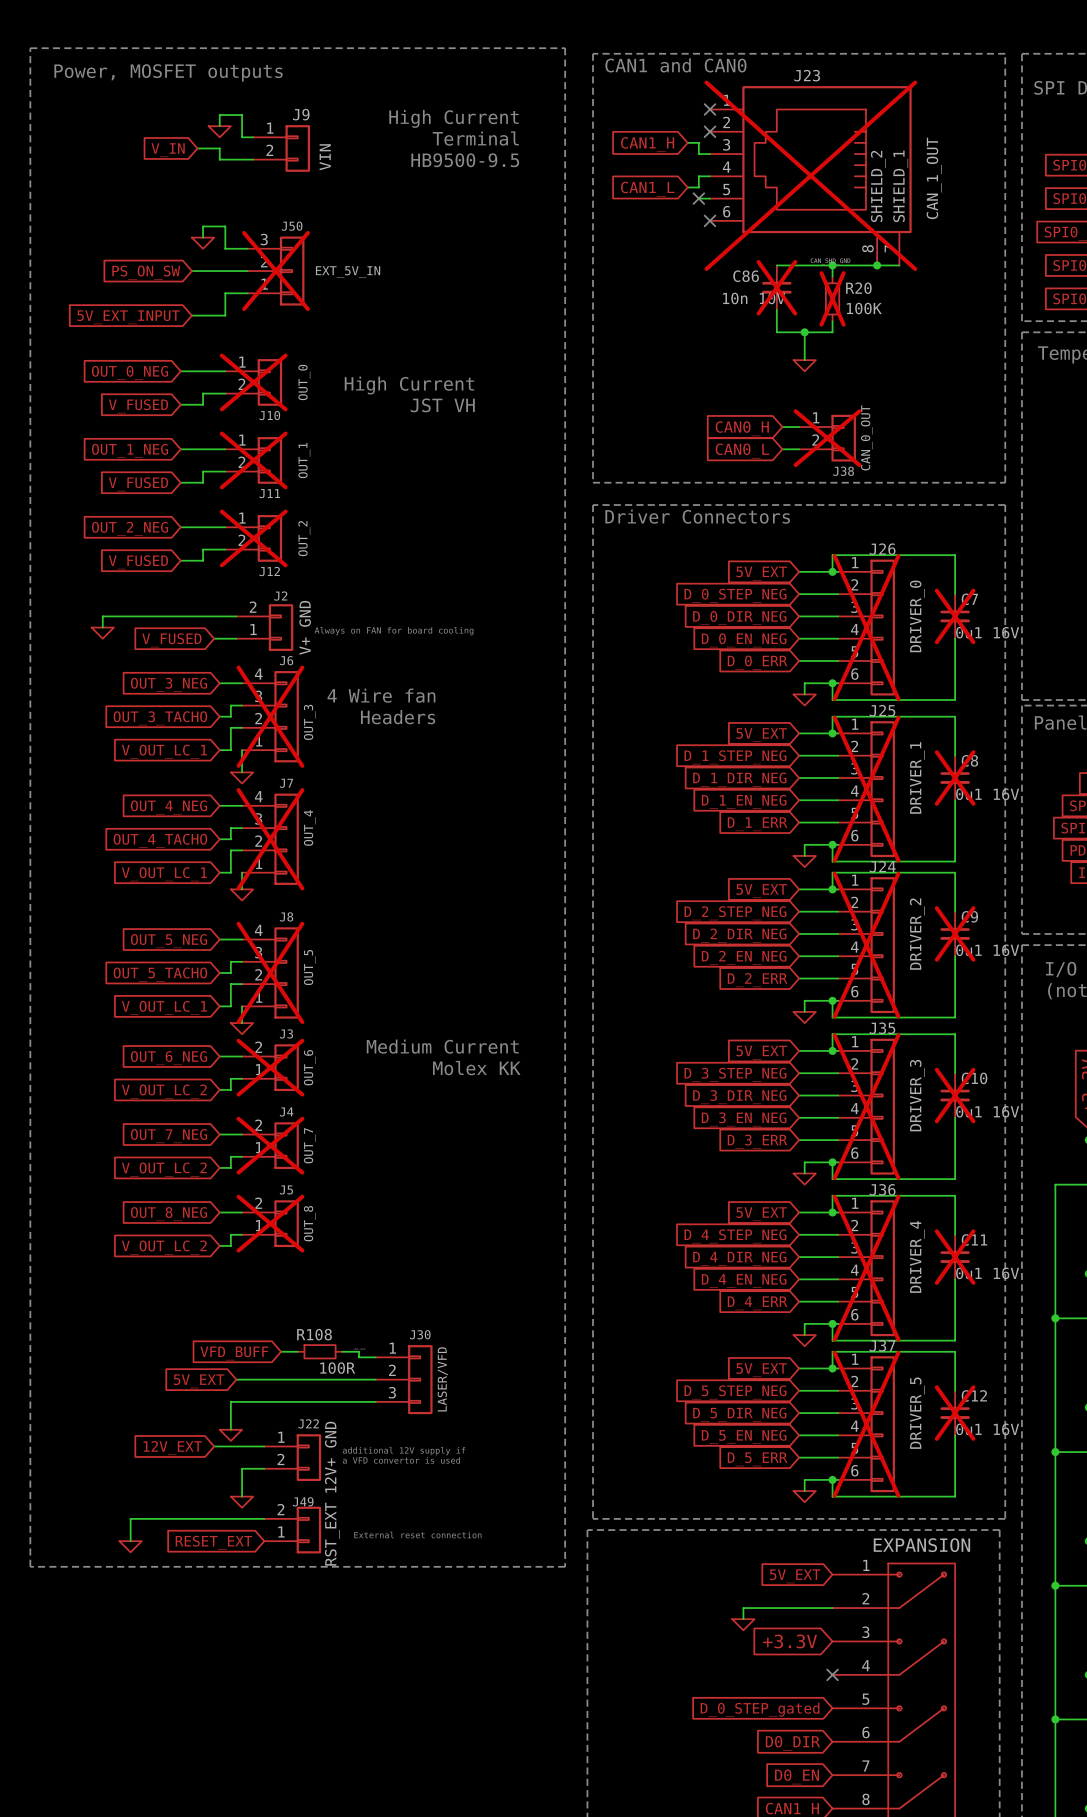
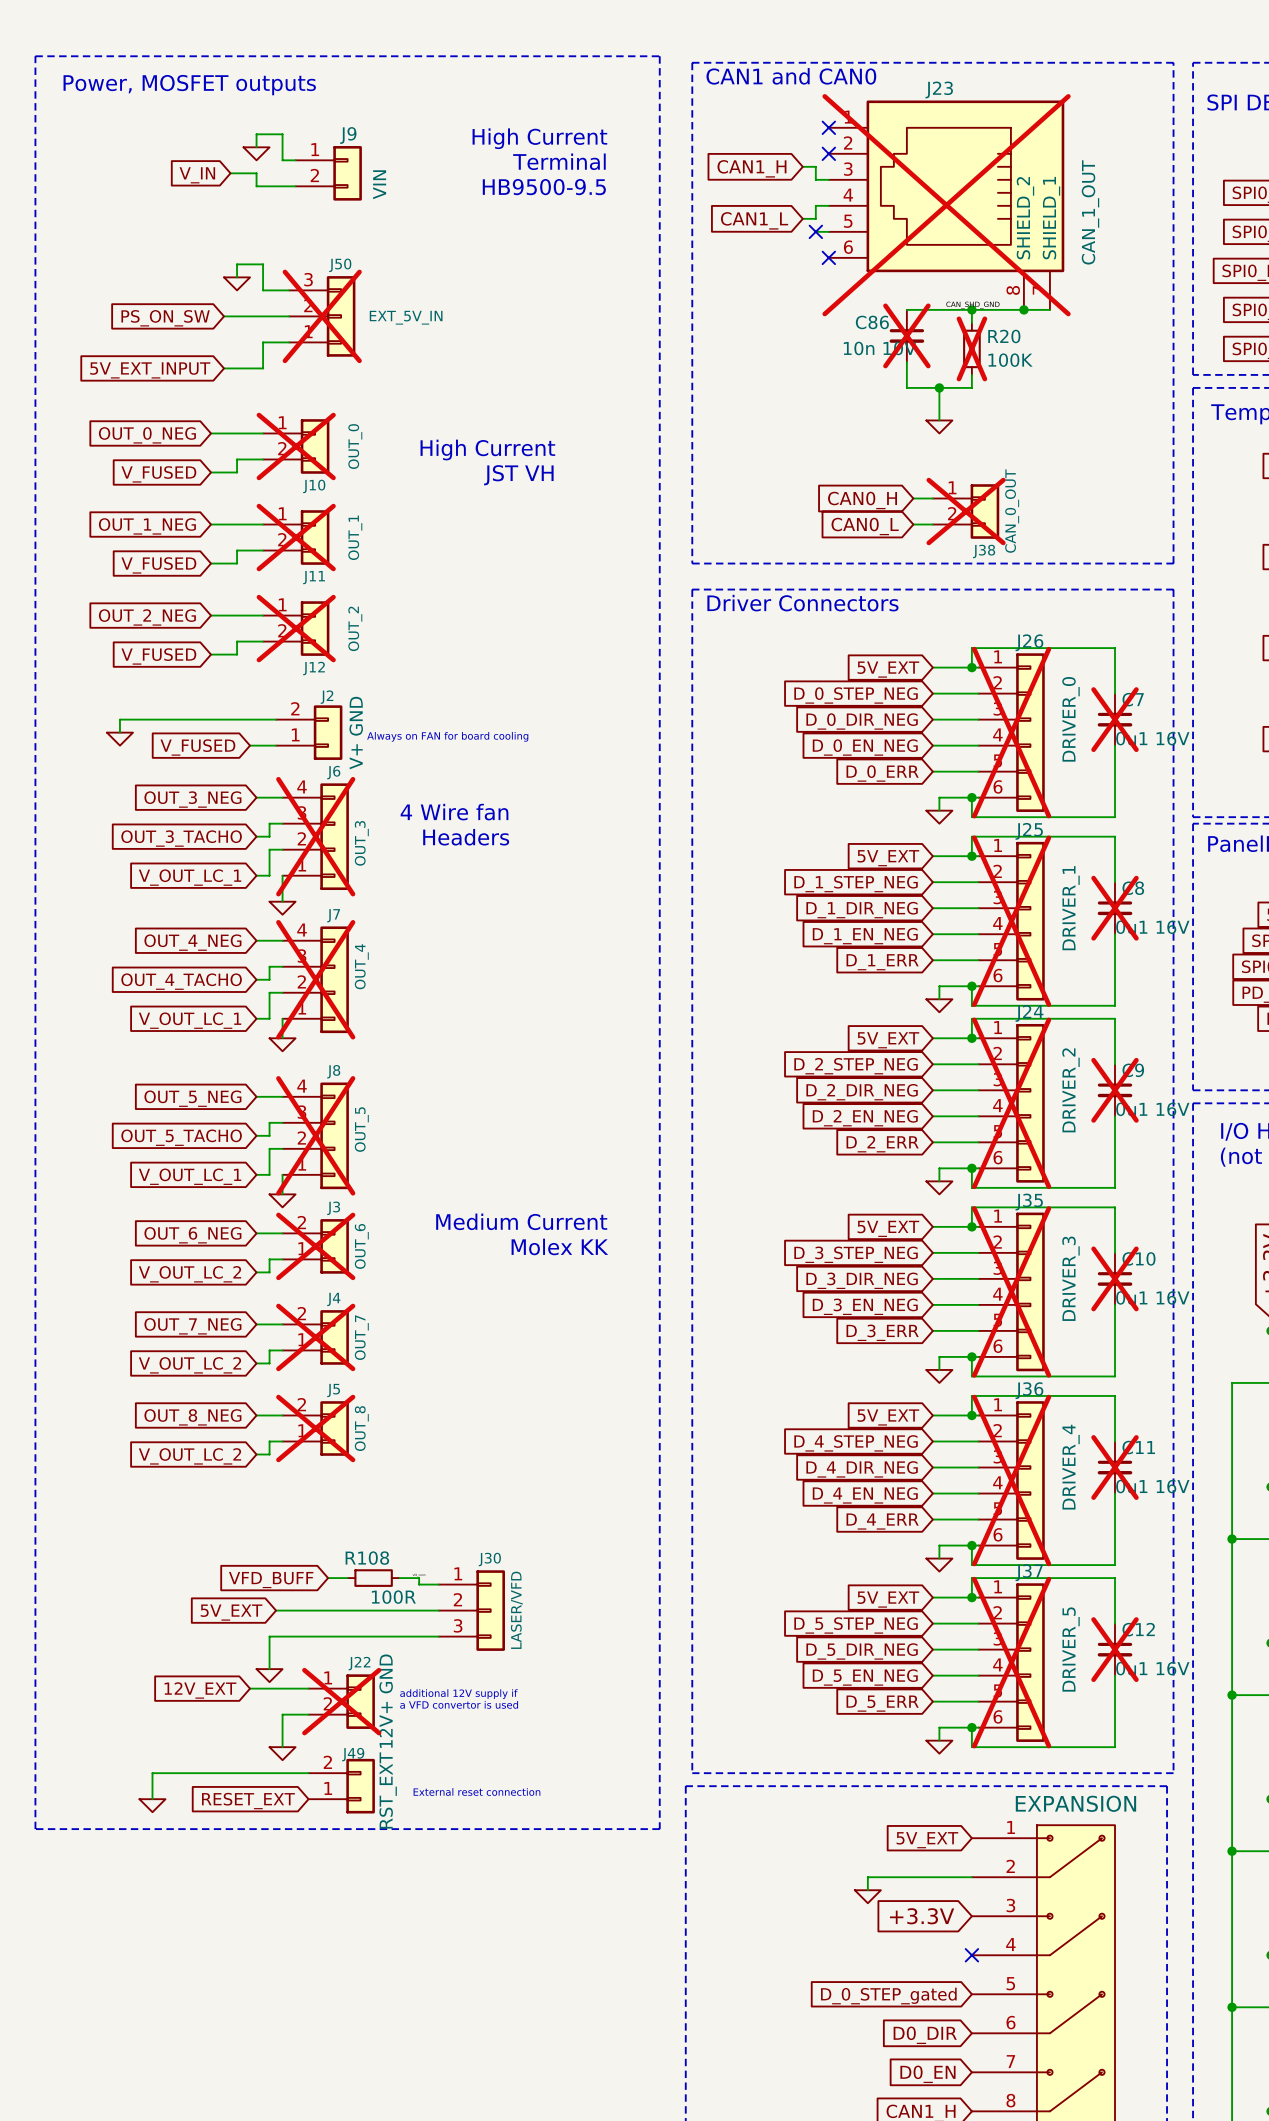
J22 do-not-place cross: none -> (341, 1701)

